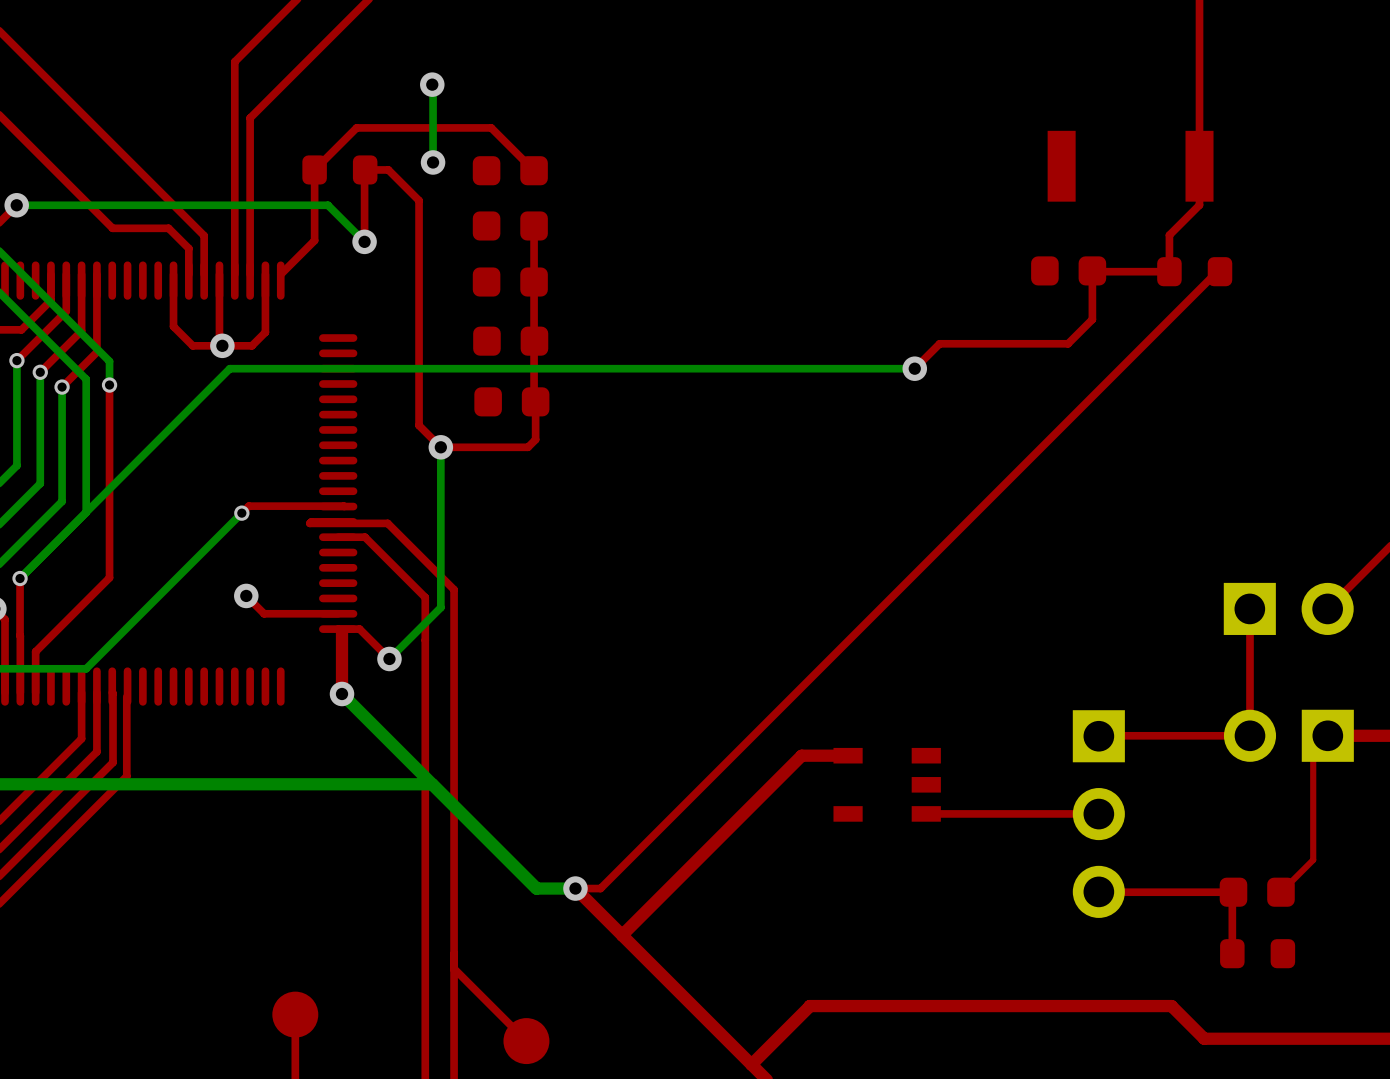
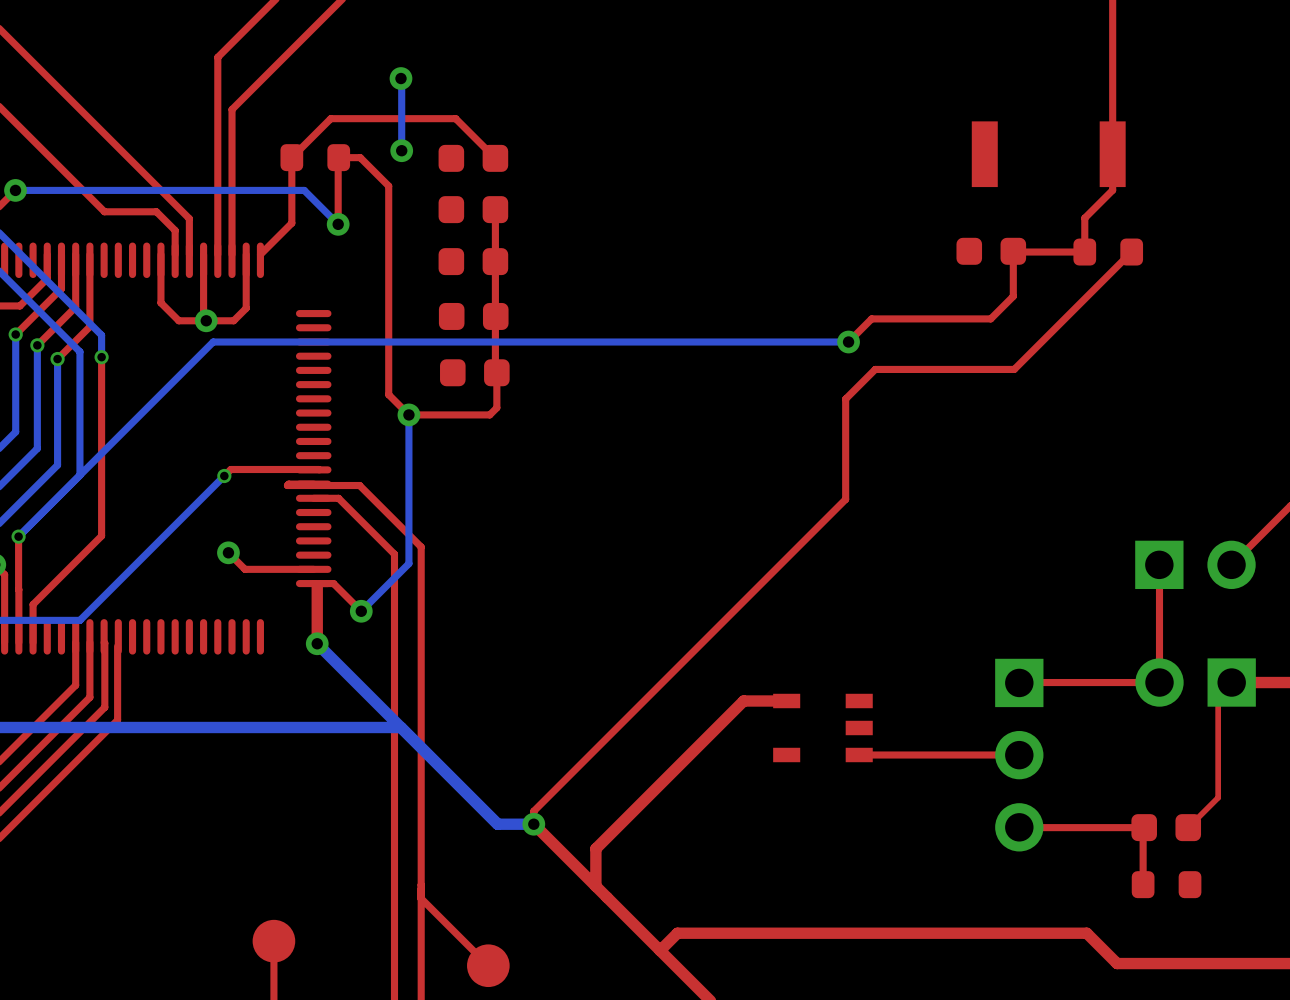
top track: (1219, 271) (1217, 271) (600, 888) (575, 888) -> (1131, 252) (1014, 369) (875, 369) (845, 399) (845, 499) (533, 811) (533, 824)
top track: (642, 915) (622, 934) -> (595, 848) (595, 886) (607, 897)
top track: (809, 1006) (751, 1064) -> (751, 933) (677, 933) (660, 950)

